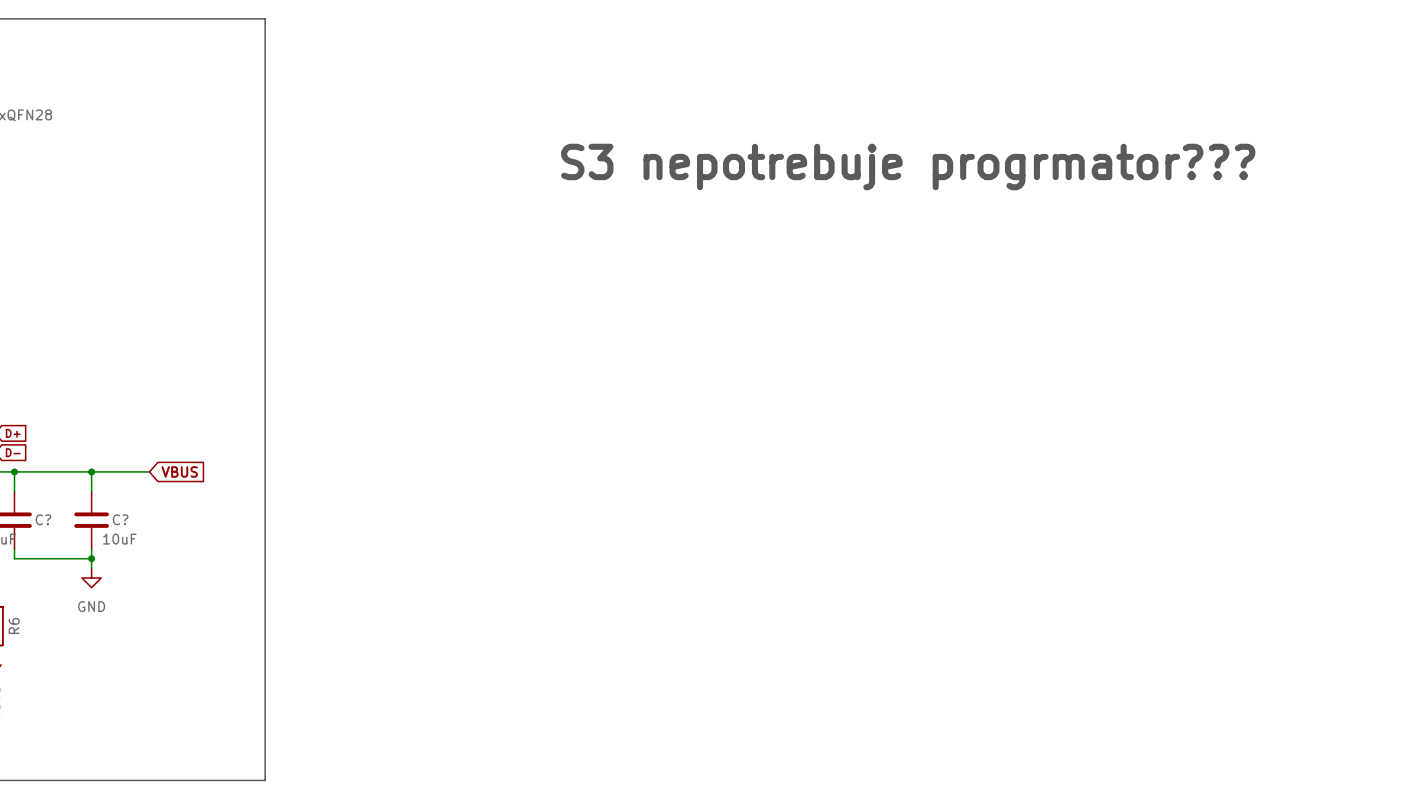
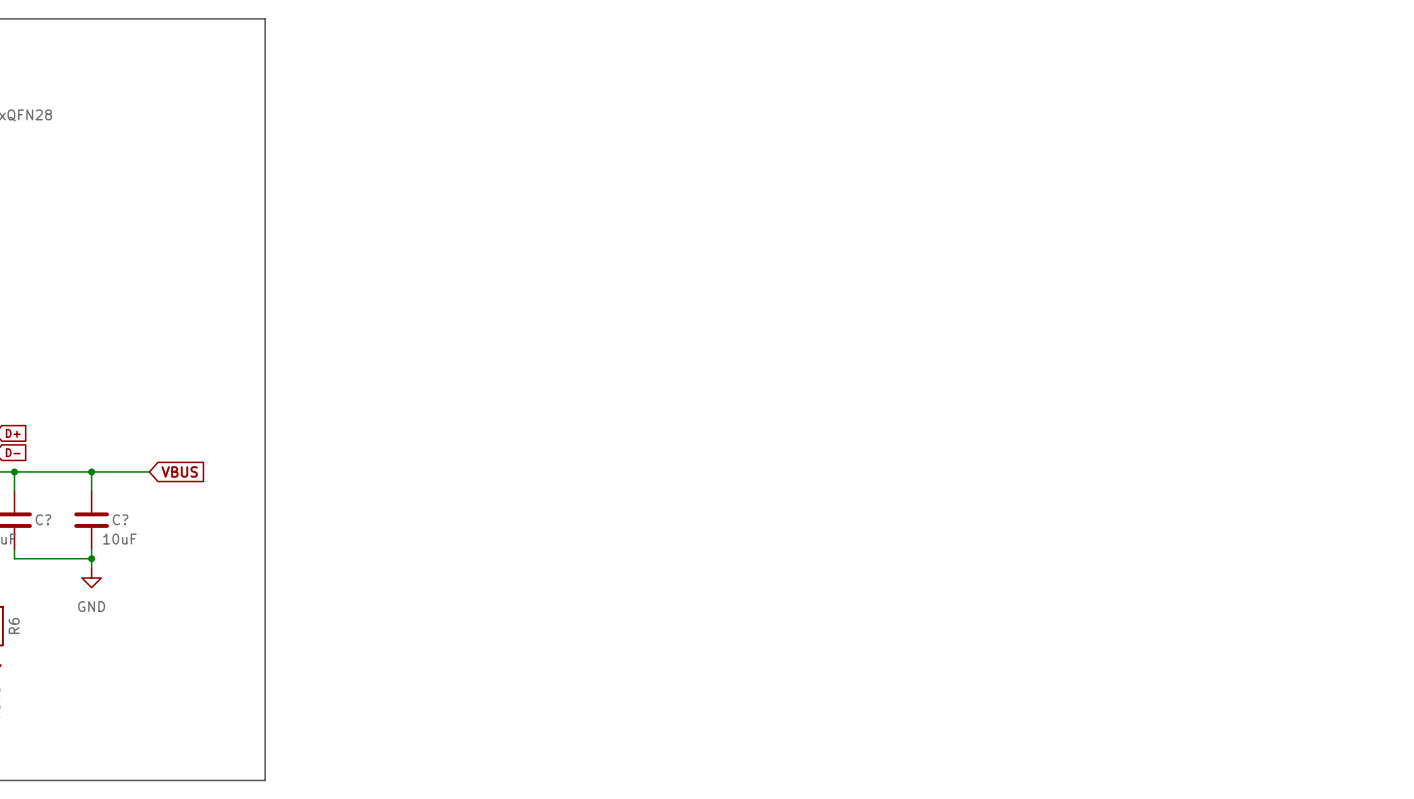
text: S3 nepotrebuje progrmator??? (908, 167) -> none

